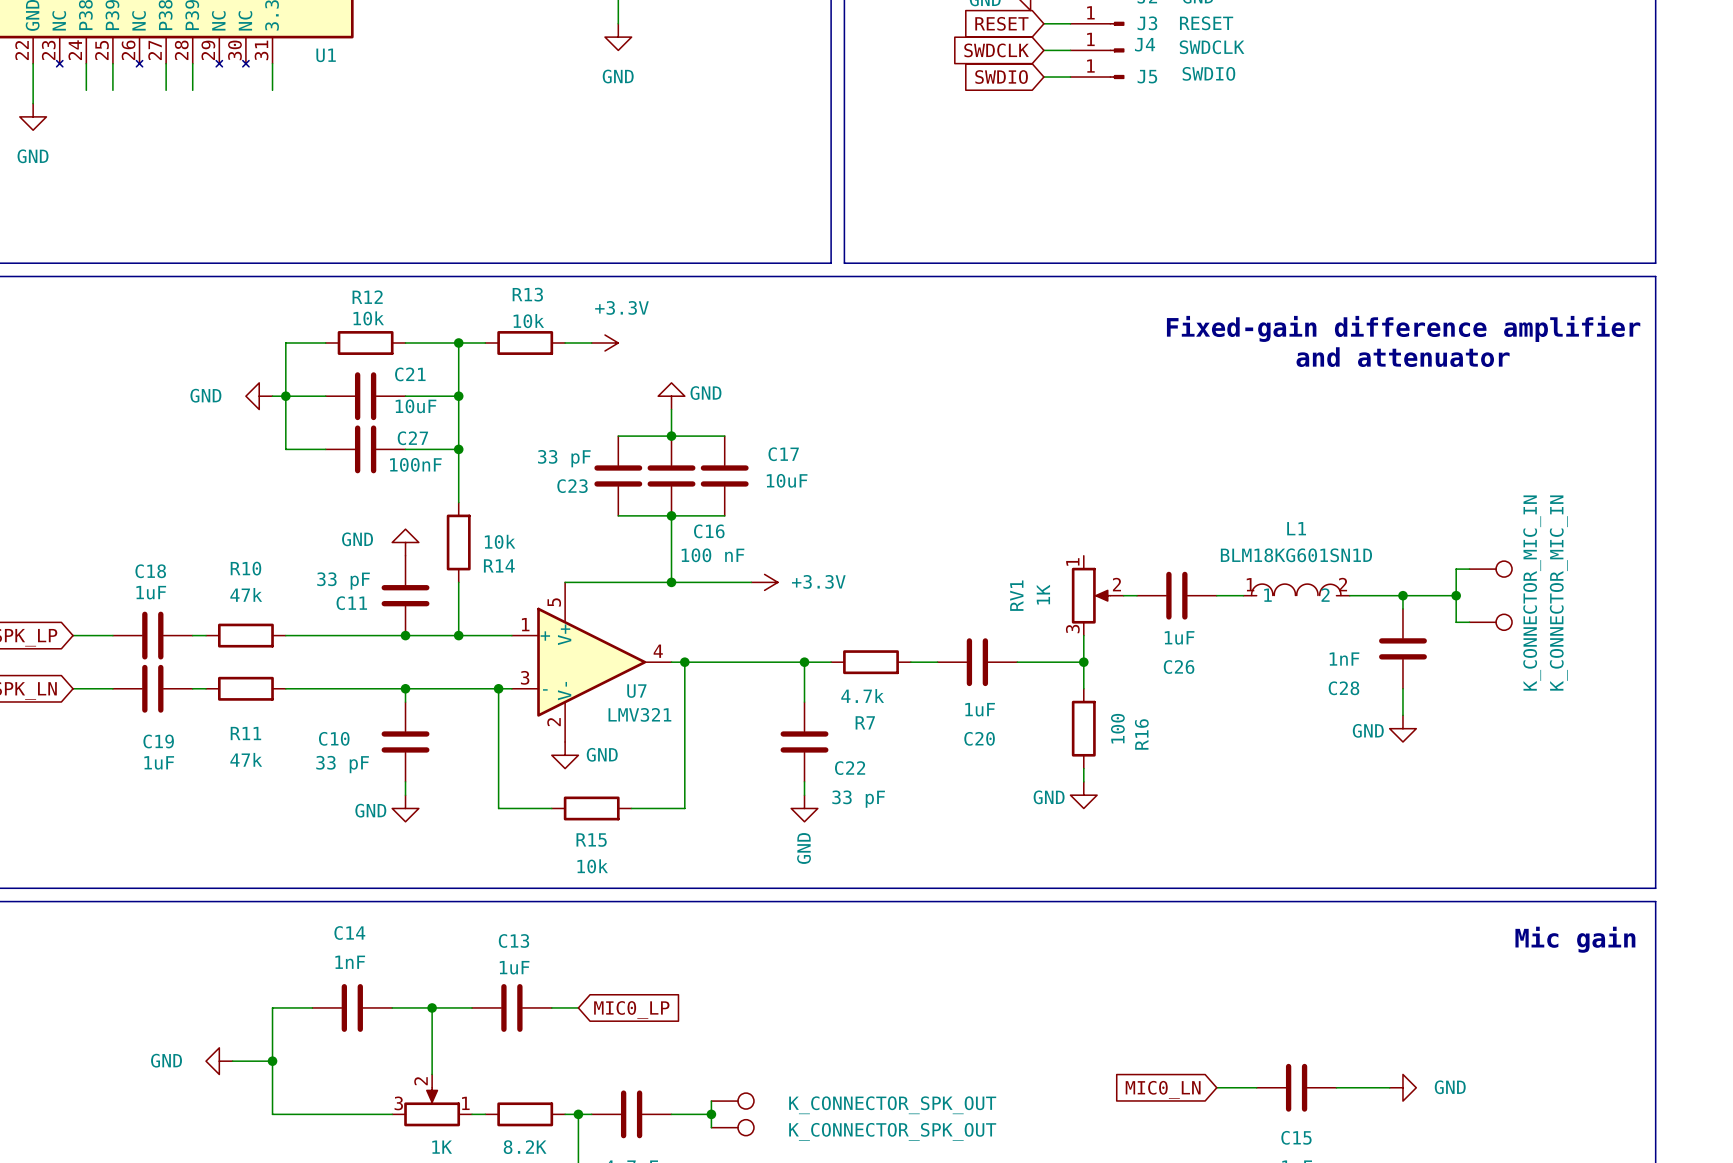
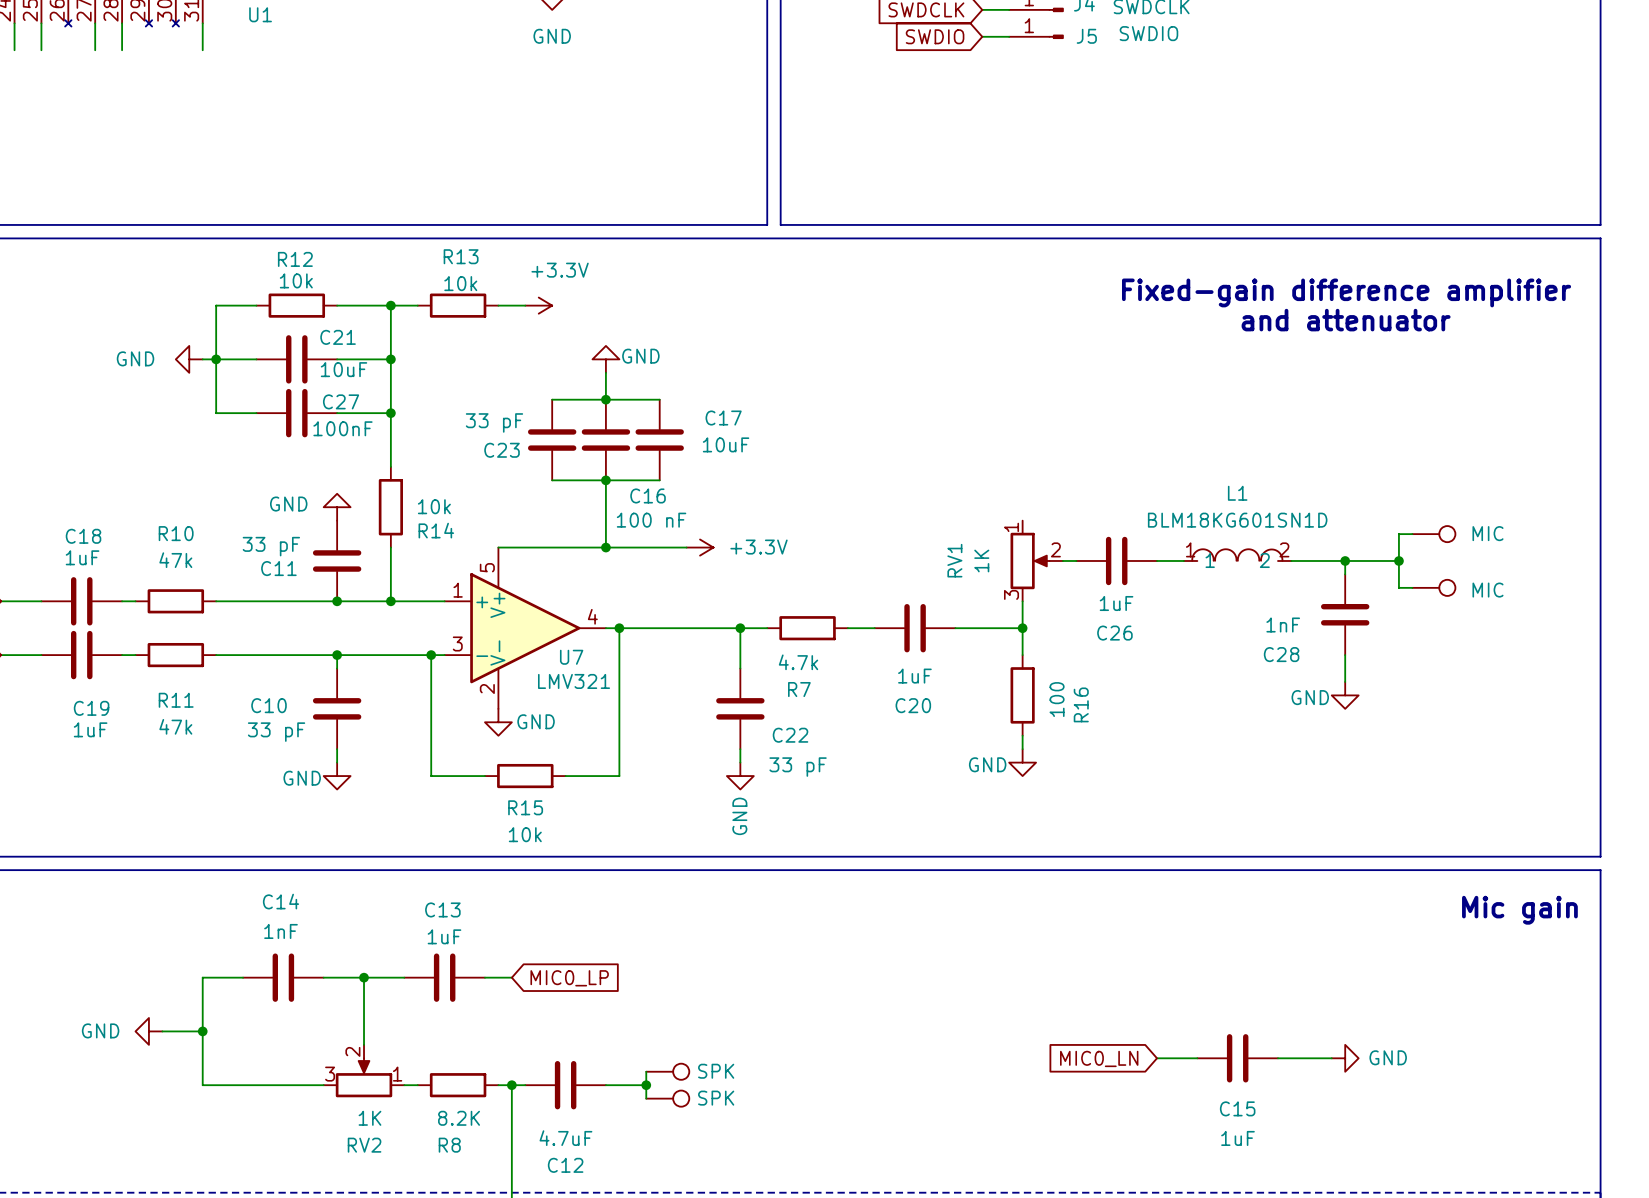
part value: K_CONNECTOR_MIC_IN (1532, 593) -> MIC (1487, 533)
part value: K_CONNECTOR_MIC_IN (1558, 593) -> MIC (1487, 590)
part value: K_CONNECTOR_SPK_OUT (892, 1105) -> SPK (716, 1071)
part value: K_CONNECTOR_SPK_OUT (892, 1131) -> SPK (716, 1098)

